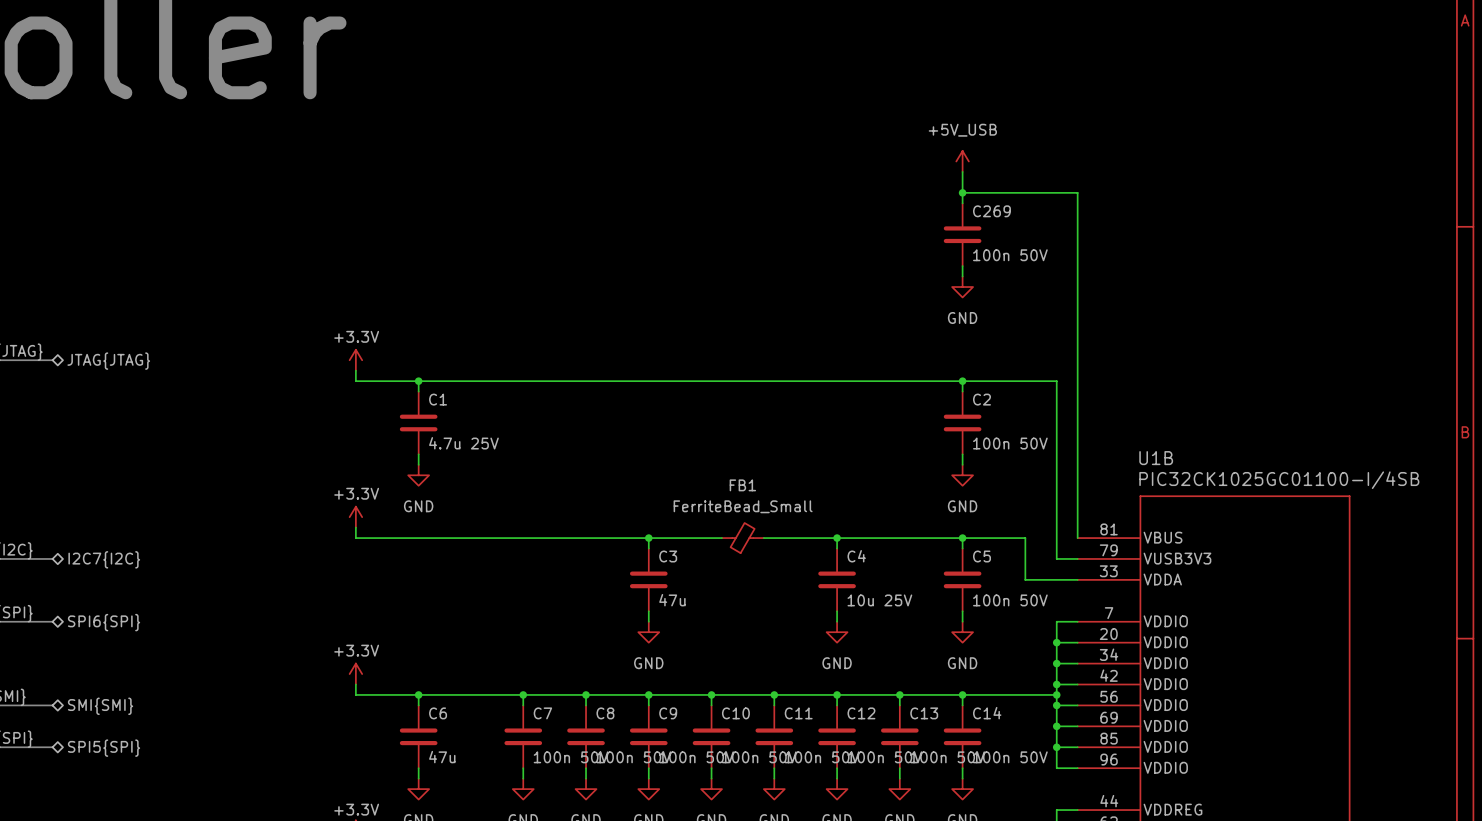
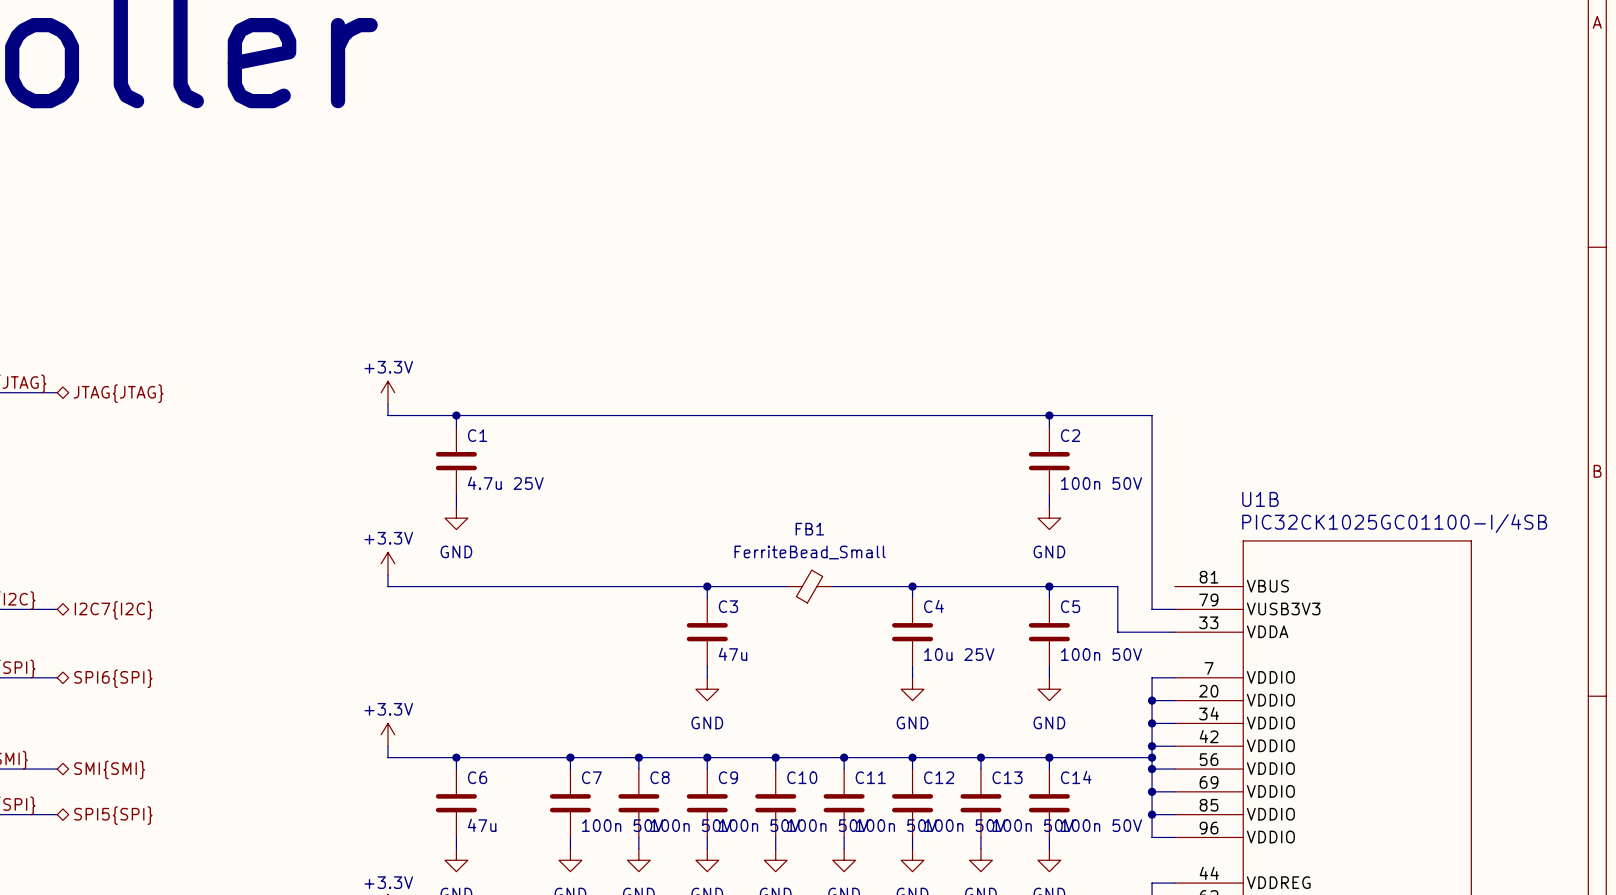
power symbol: +5V_USB (962, 161) -> none
wire: (962, 171) (962, 203) -> none
wire: (962, 192) (1077, 192) (1077, 538) -> none
junction: (962, 192) -> none
C269: 100n 50V (962, 234) -> none
wire: (962, 266) (962, 276) -> none
power symbol: GND (962, 287) -> none

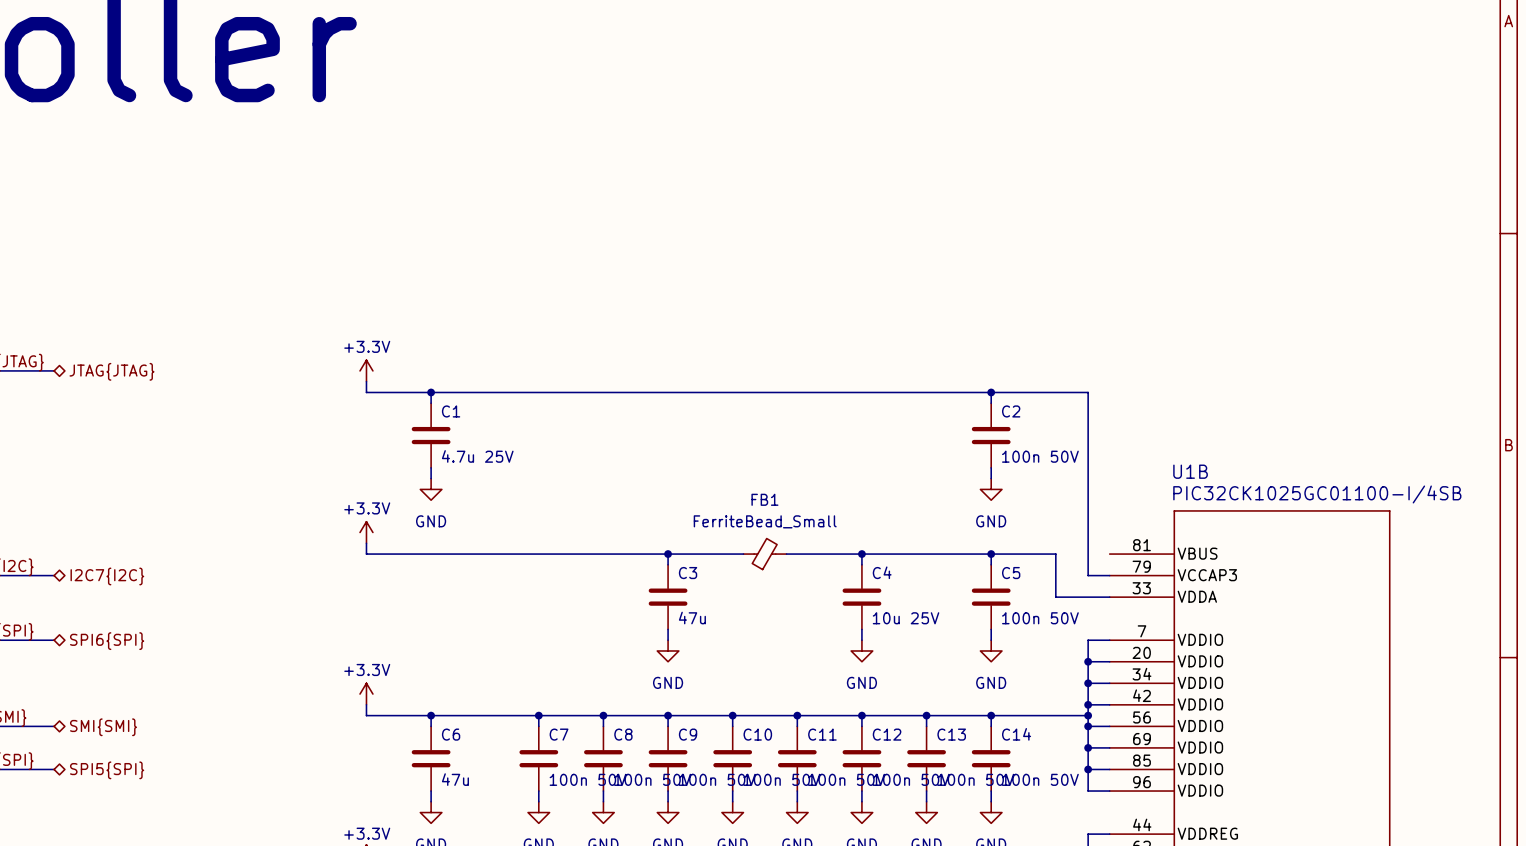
U1B pin name: VUSB3V3 (1283, 608) -> VCCAP3 (1207, 575)

